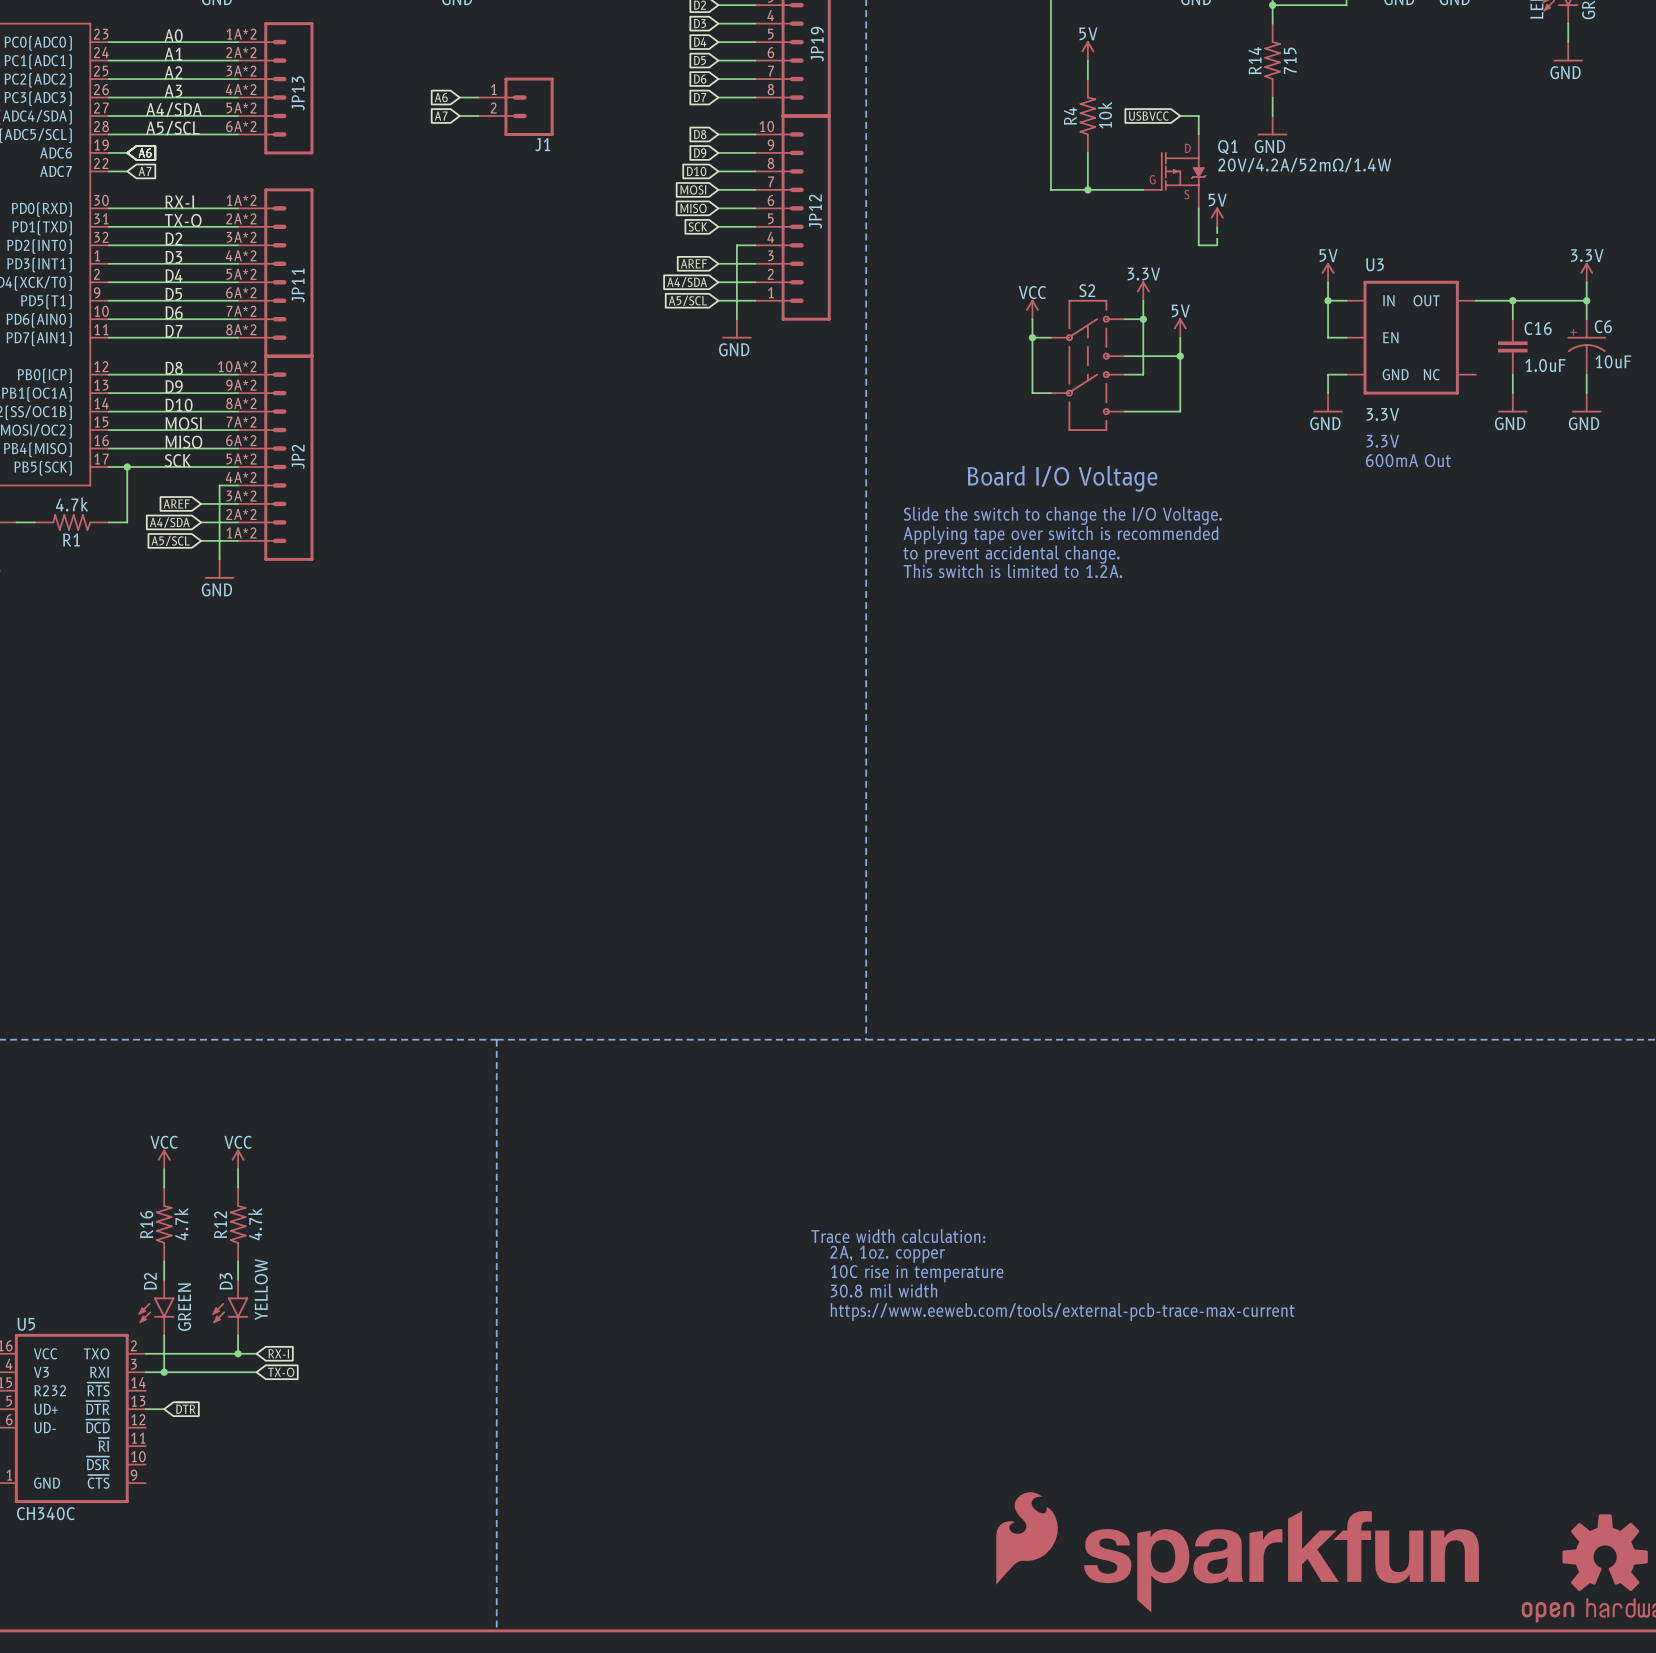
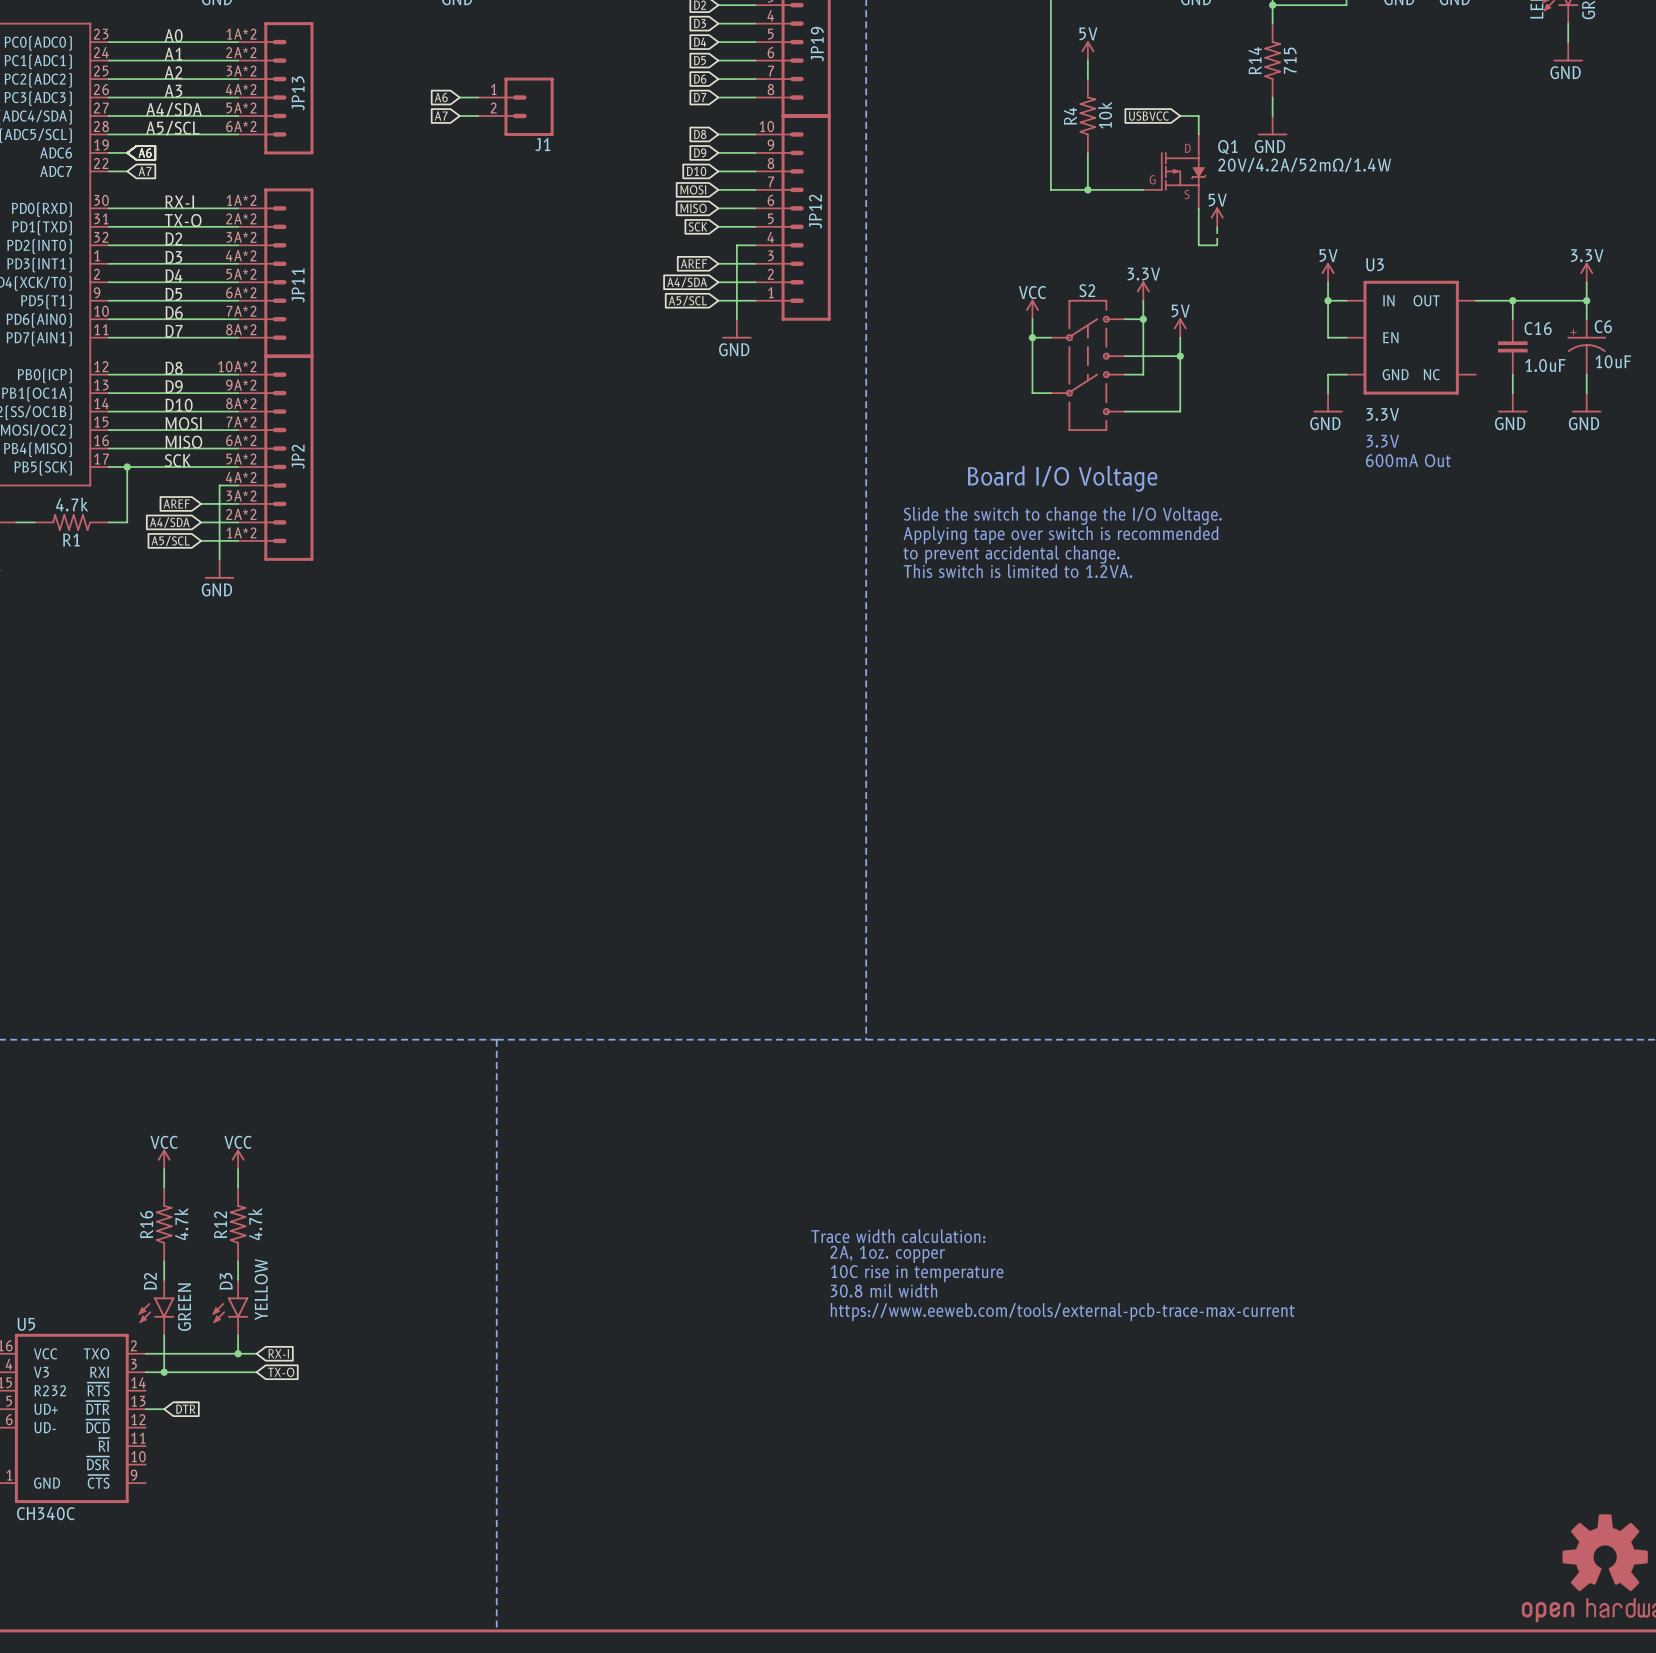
text: This switch is limited to 1.2A. (1013, 571) -> This switch is limited to 1.2VA. (1017, 571)
part: (1027, 1538) -> none
part: (1281, 1561) -> none

